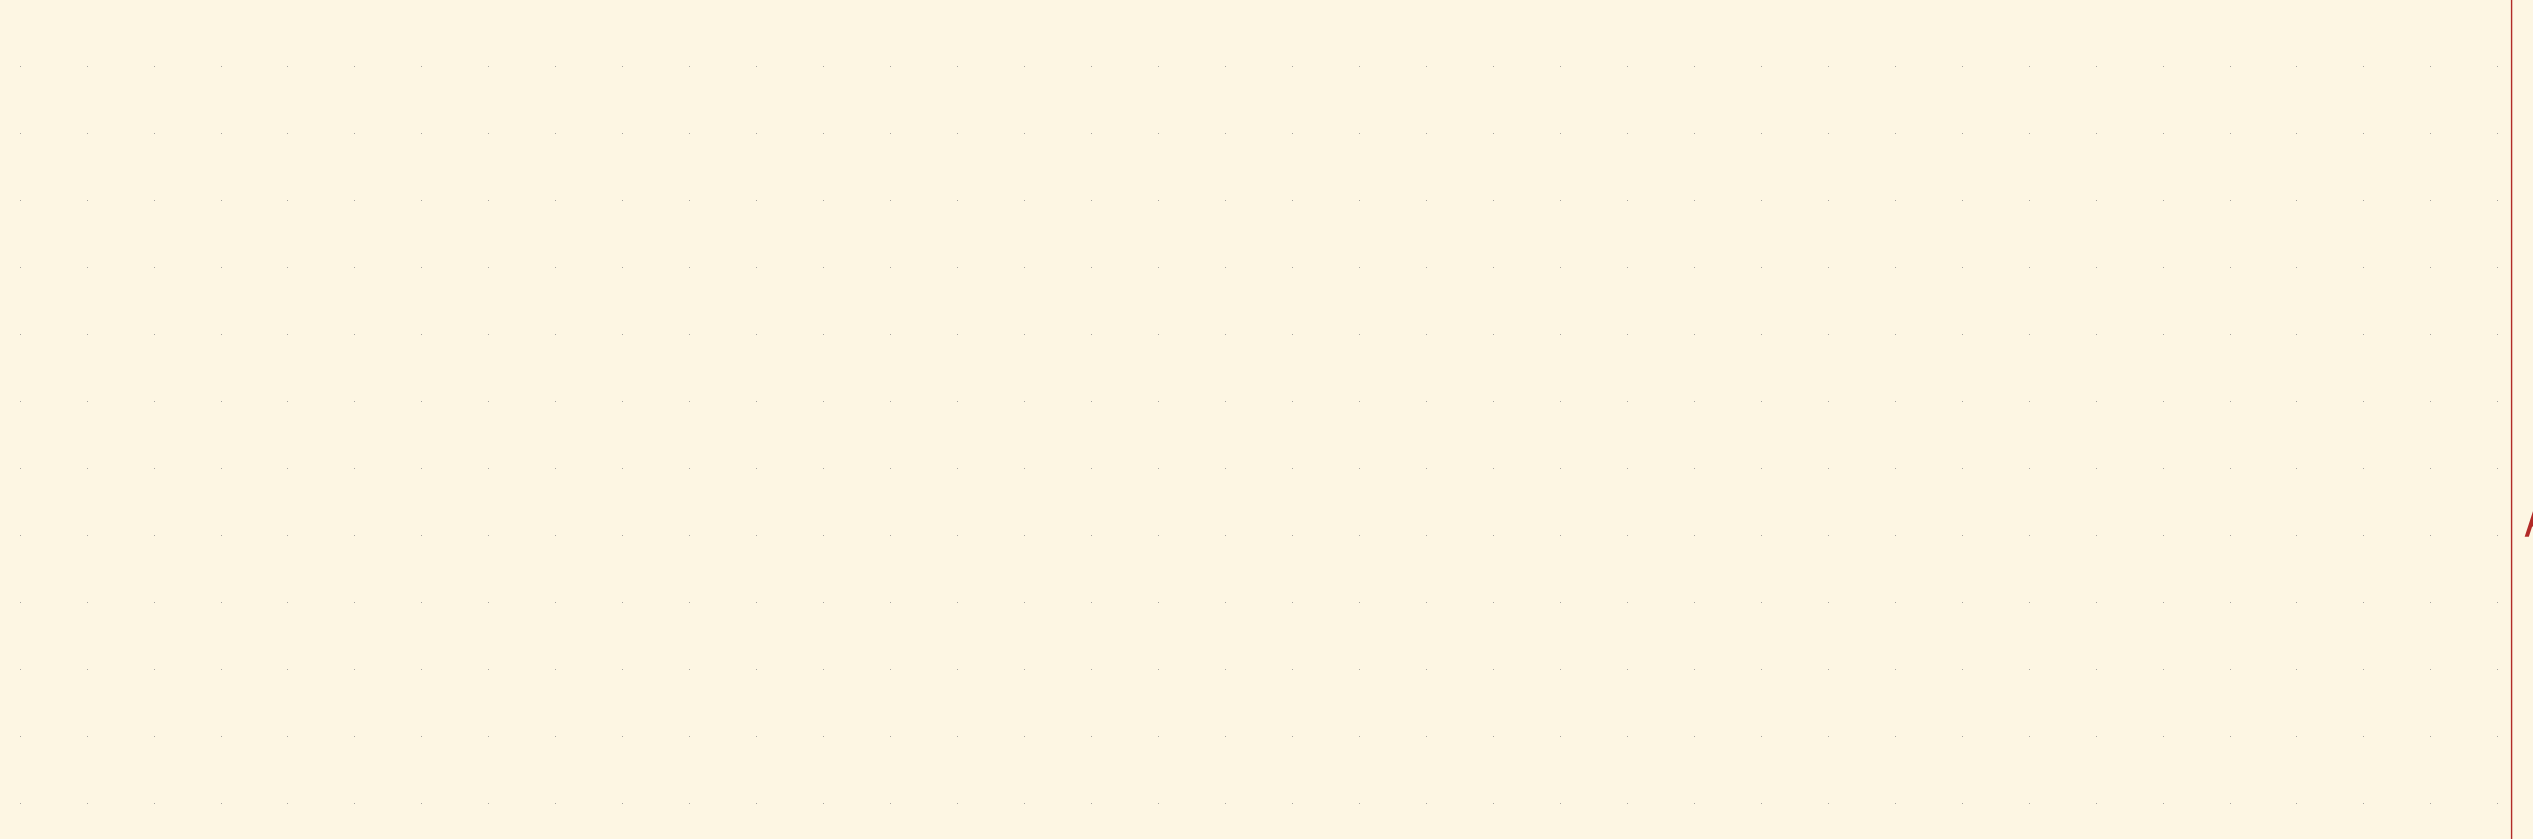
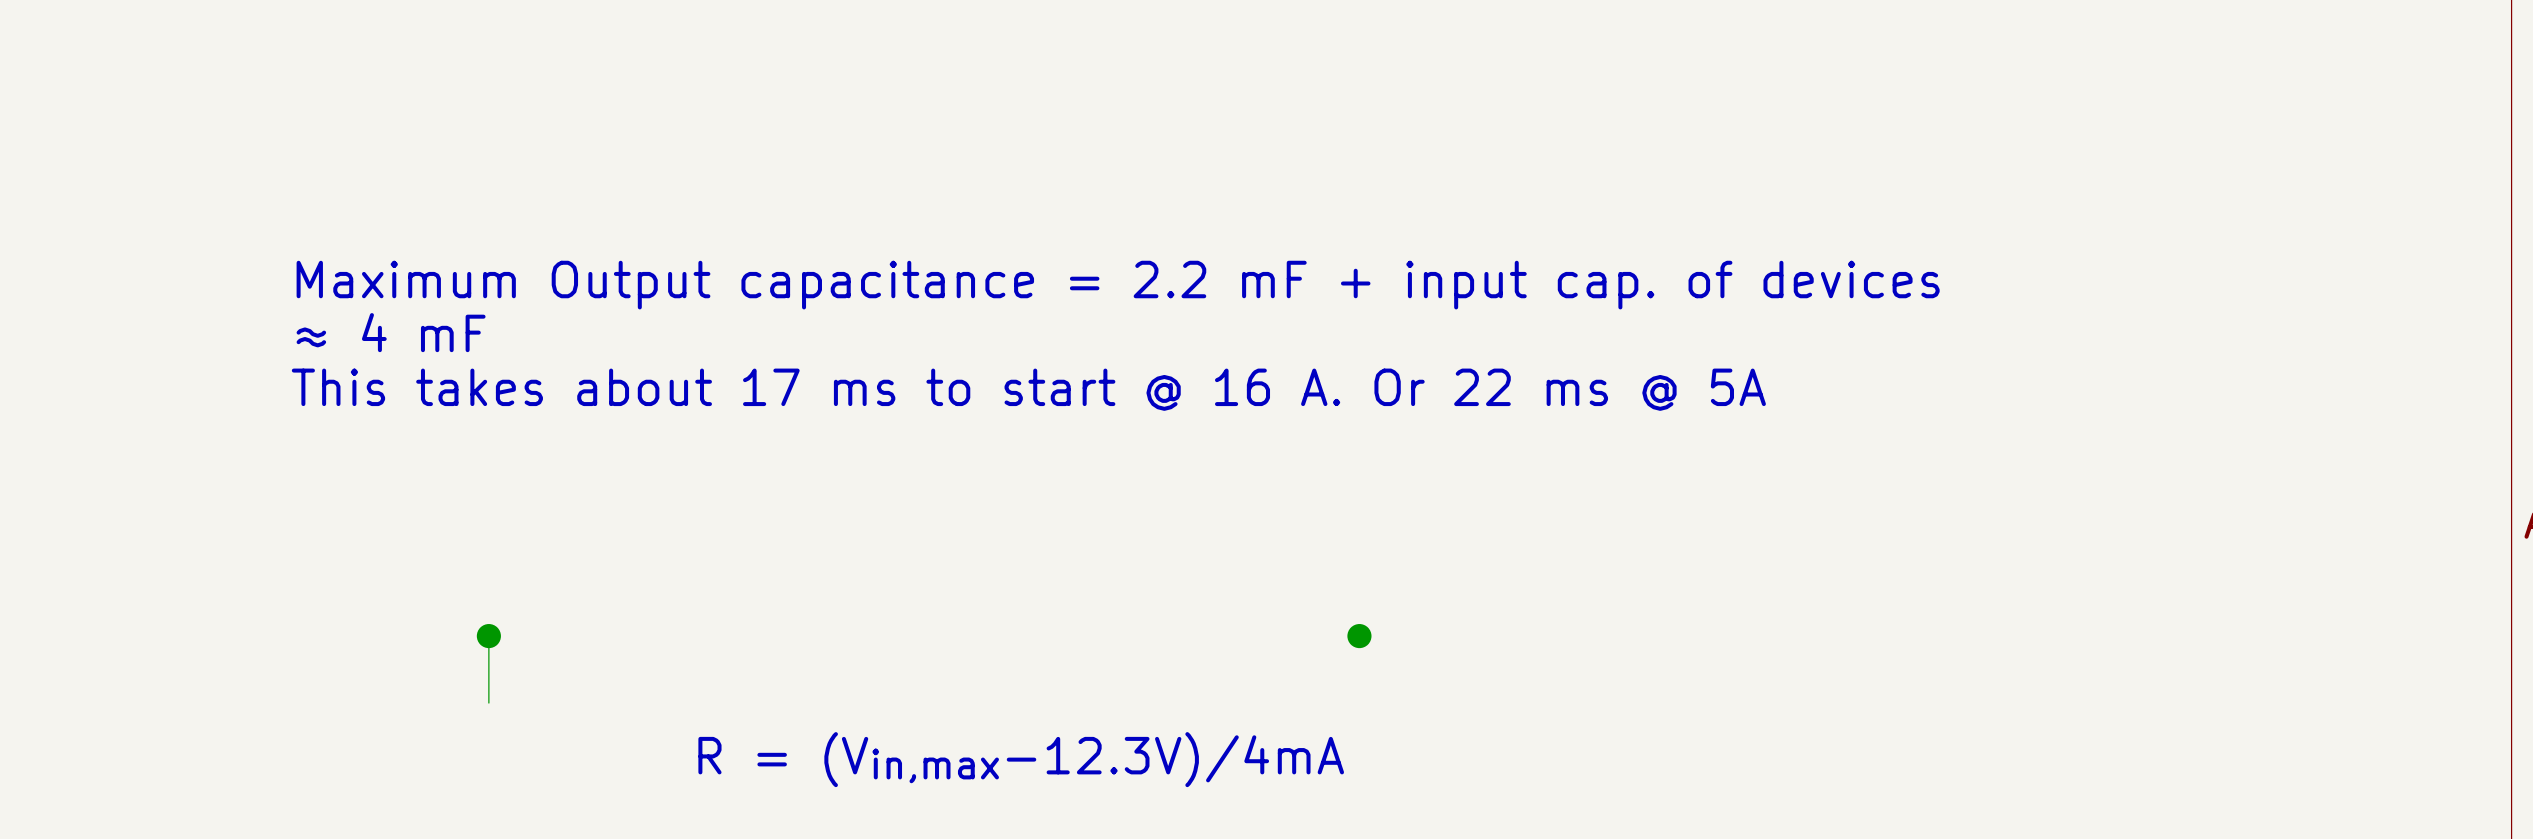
text: none -> Maximum Output capacitance = 2.2 mF + input cap. of devices (1118, 285)
text: none -> ≈ 4 mF (391, 332)
text: none -> This takes about 17 ms to start @ 16 A. Or 22 ms @ 5A (1028, 389)
wire: none -> (488, 636) (488, 703)
junction: none -> (488, 636)
junction: none -> (1359, 636)
text: none -> R = (Vin,max-12.3V)/4mA (1021, 759)

